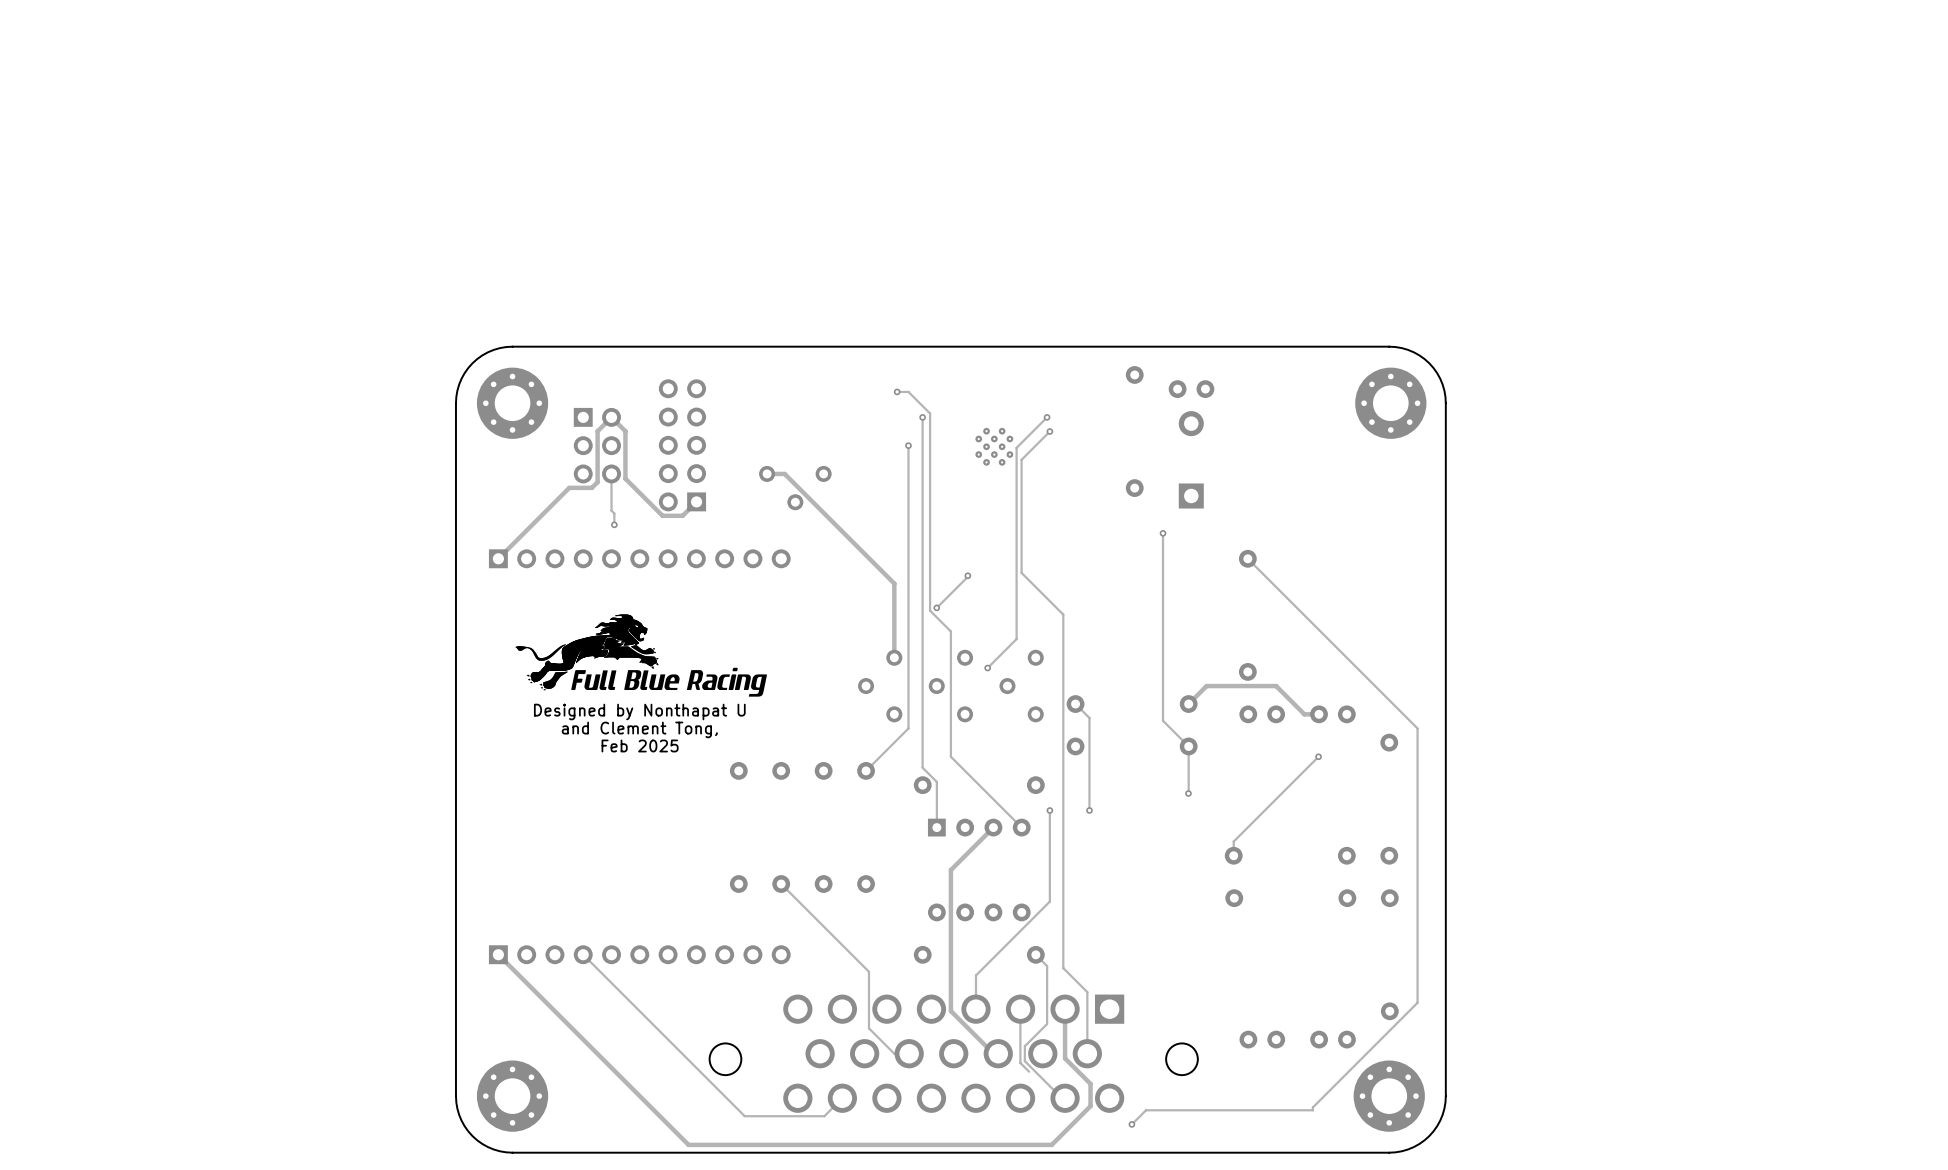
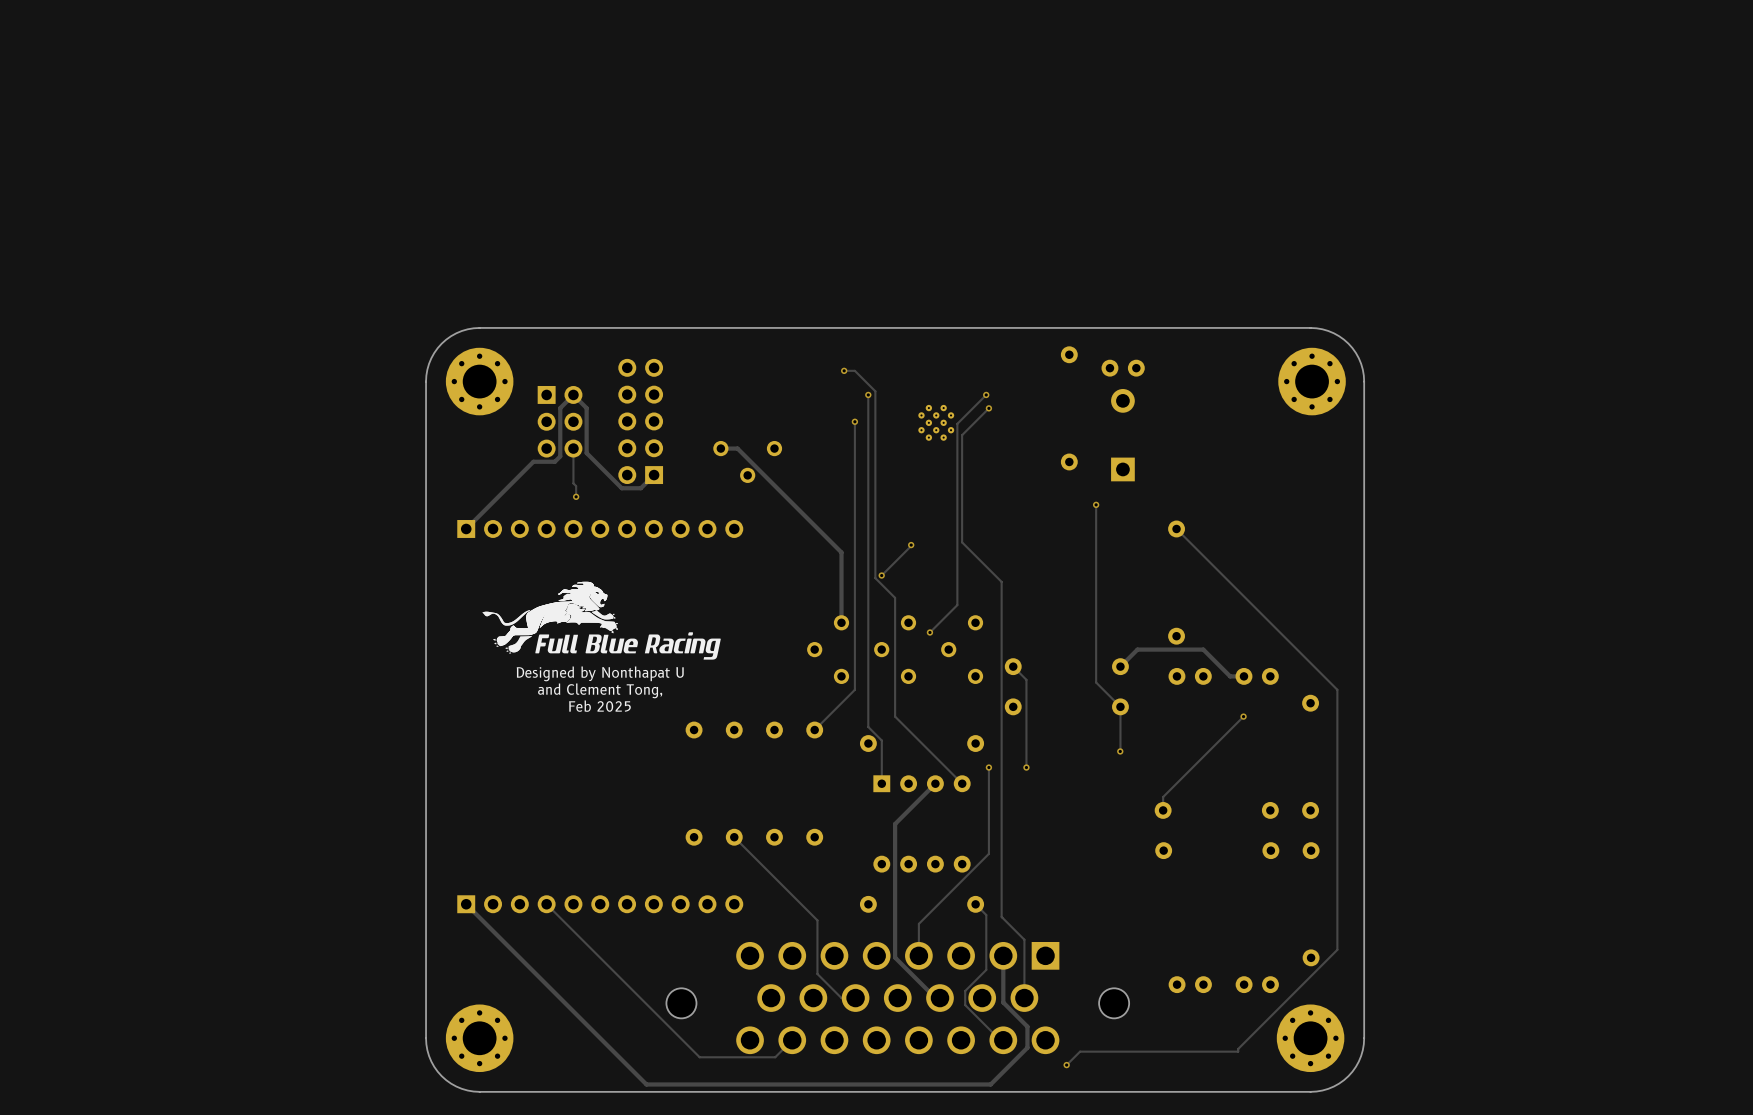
track: (1020, 1009) (1020, 1062) (1029, 1071) -> none

